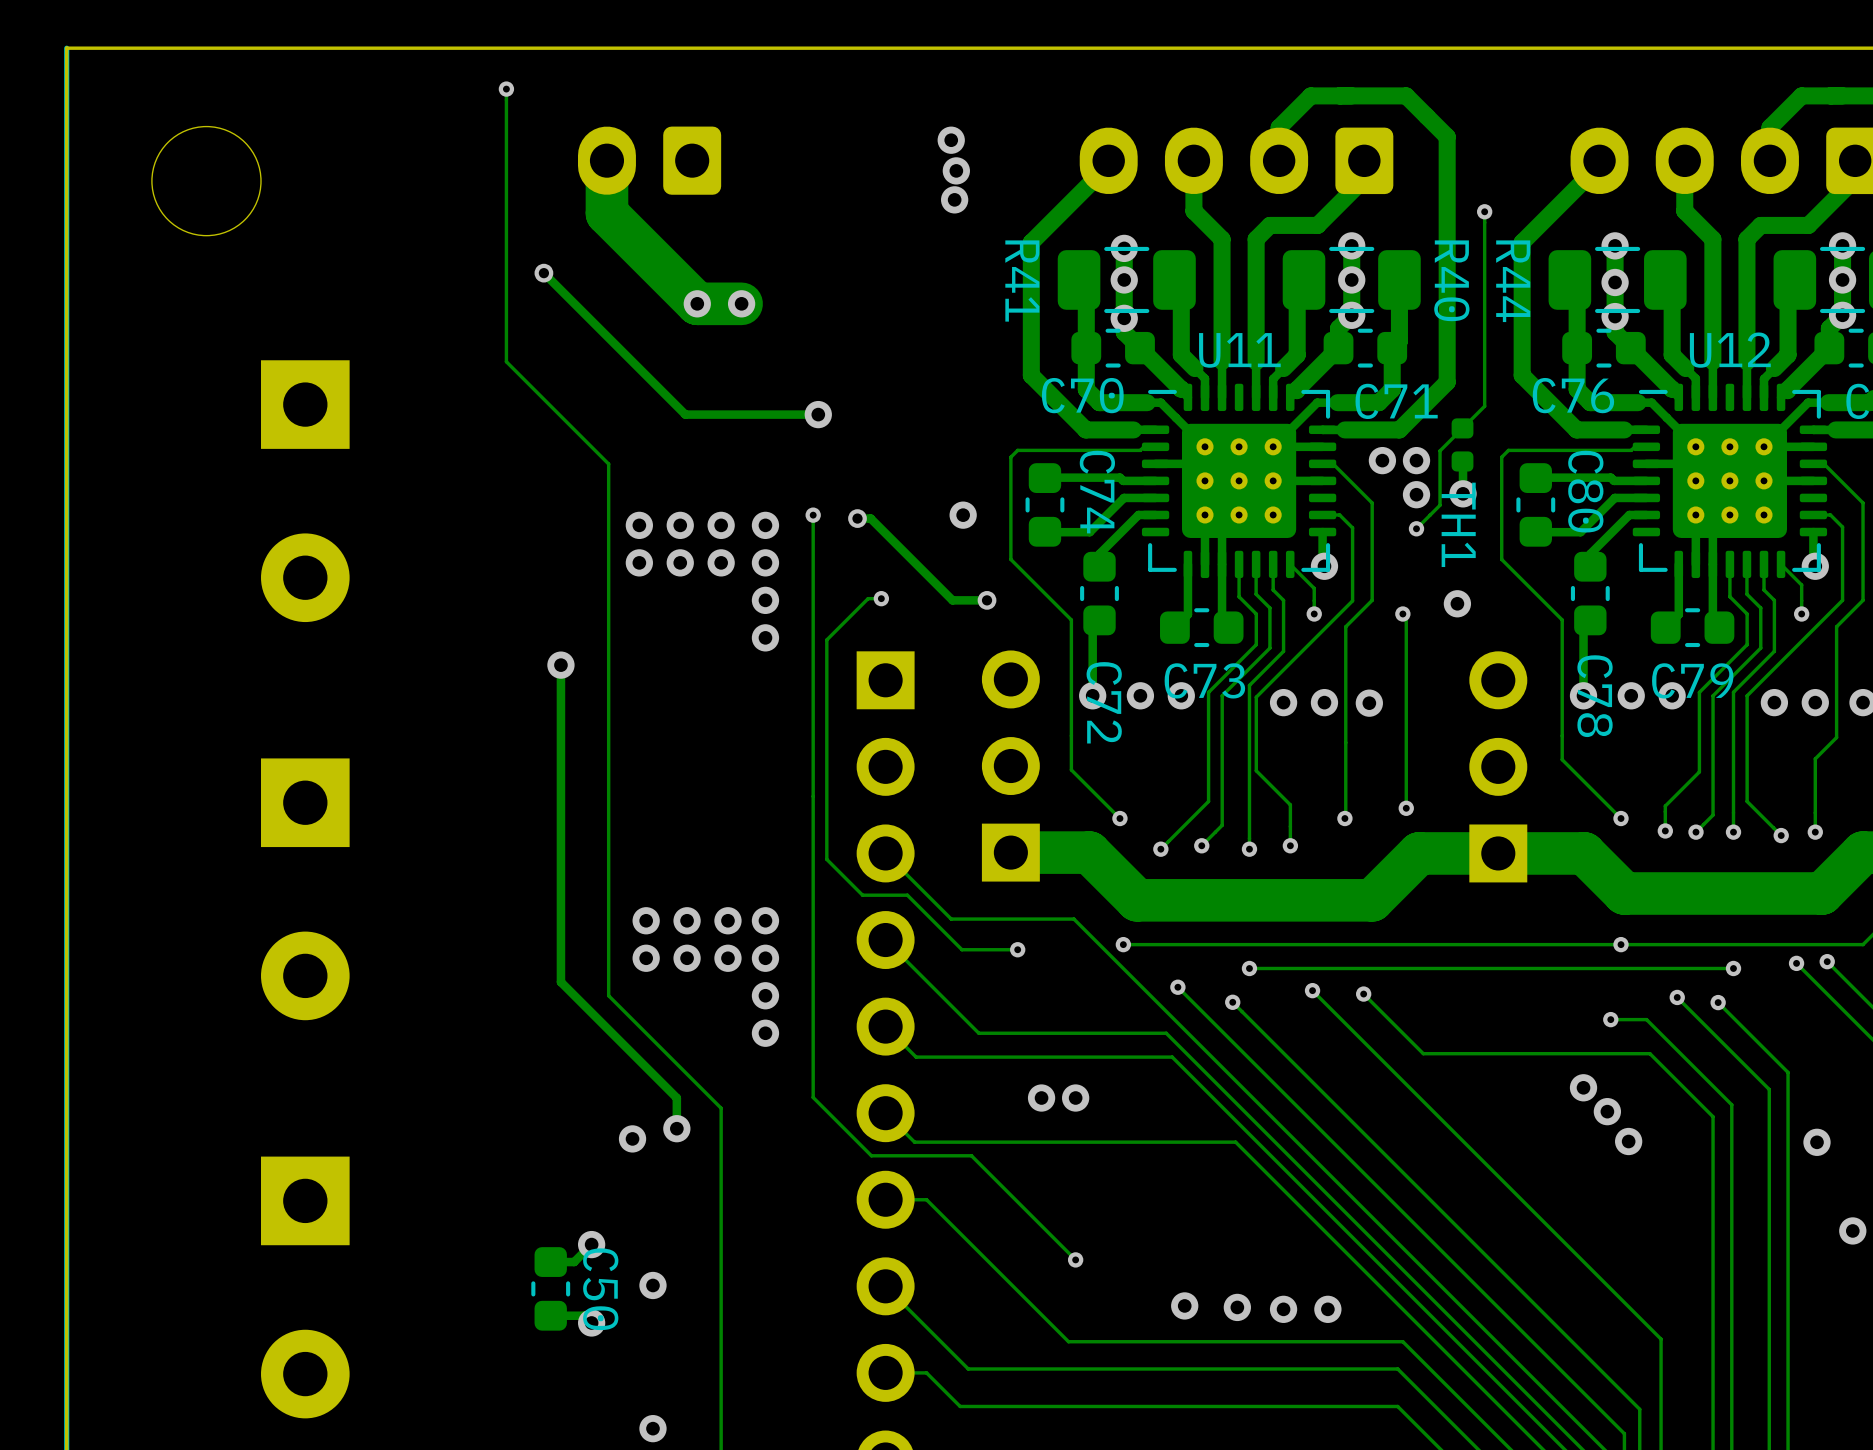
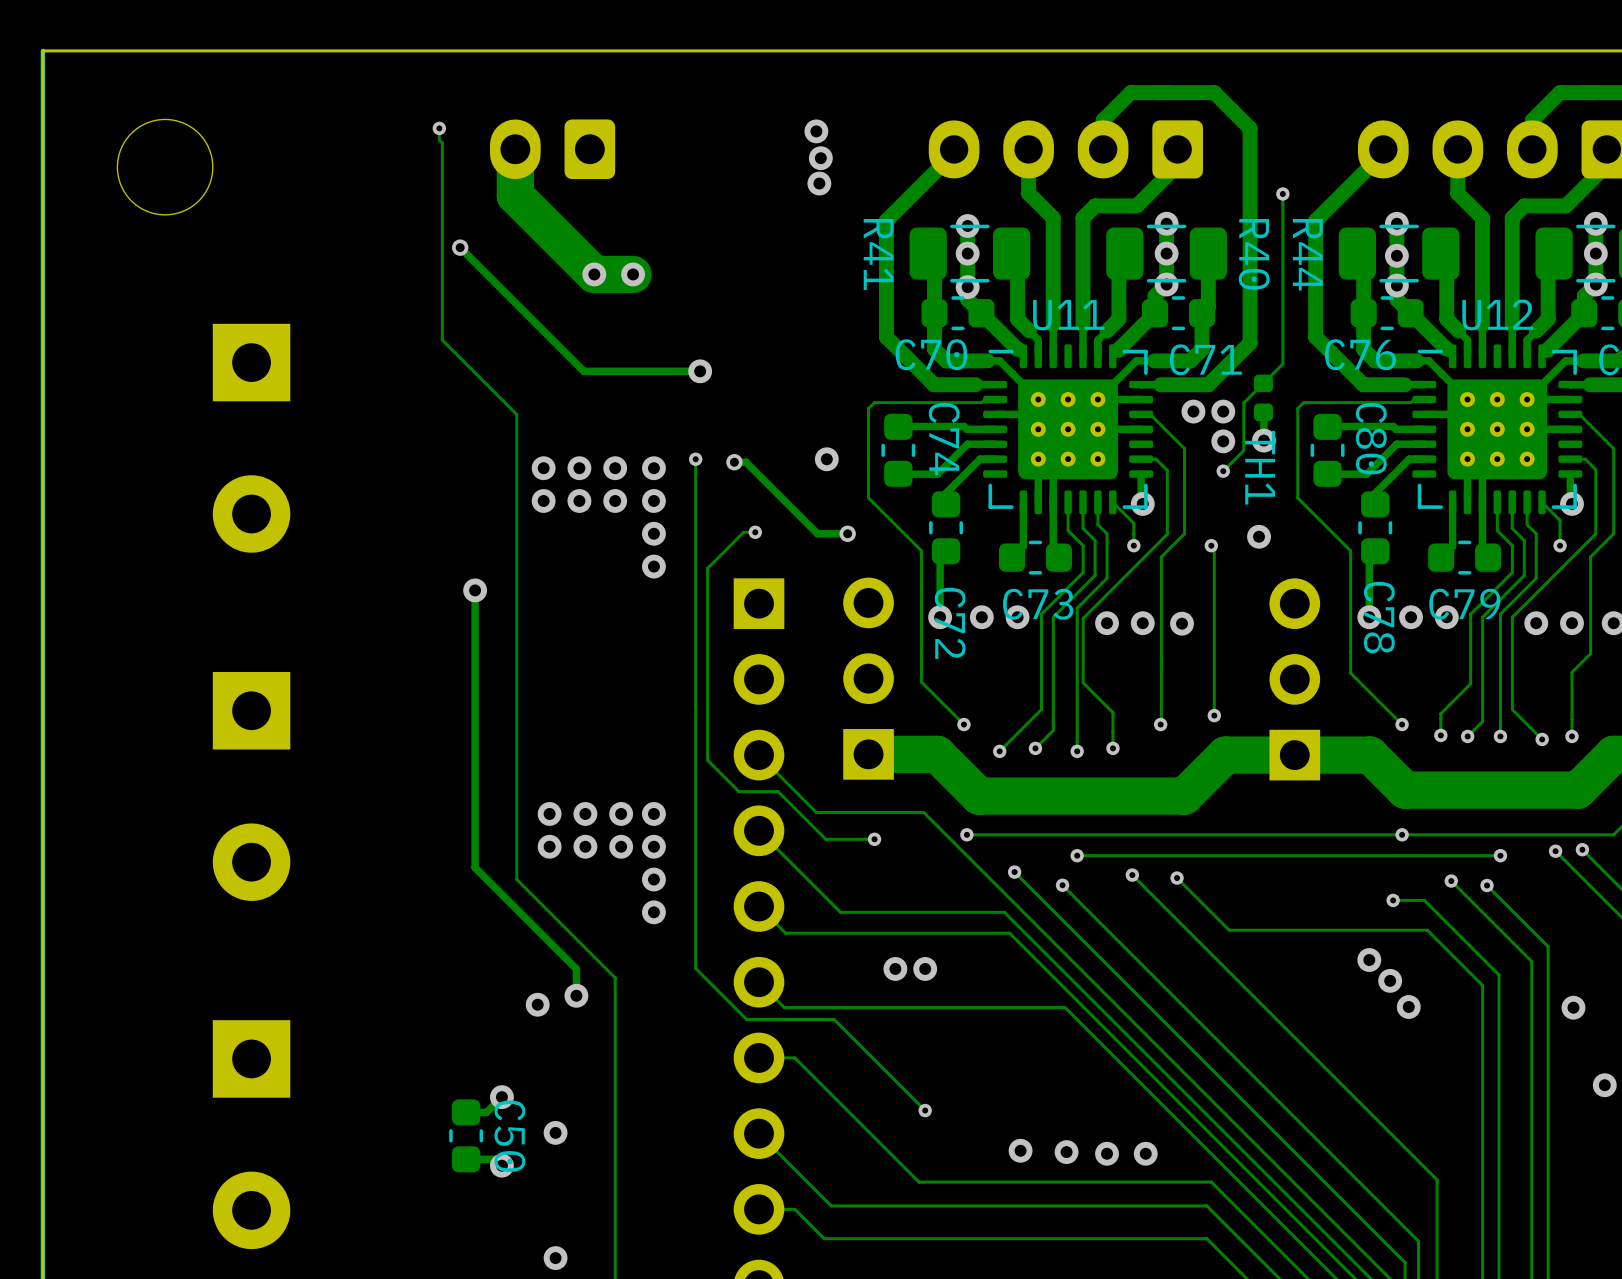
track: (506, 89) (506, 361) (523, 378) -> (439, 128) (439, 139) (442, 142) (442, 340)
via position: (506, 89) -> (439, 128)

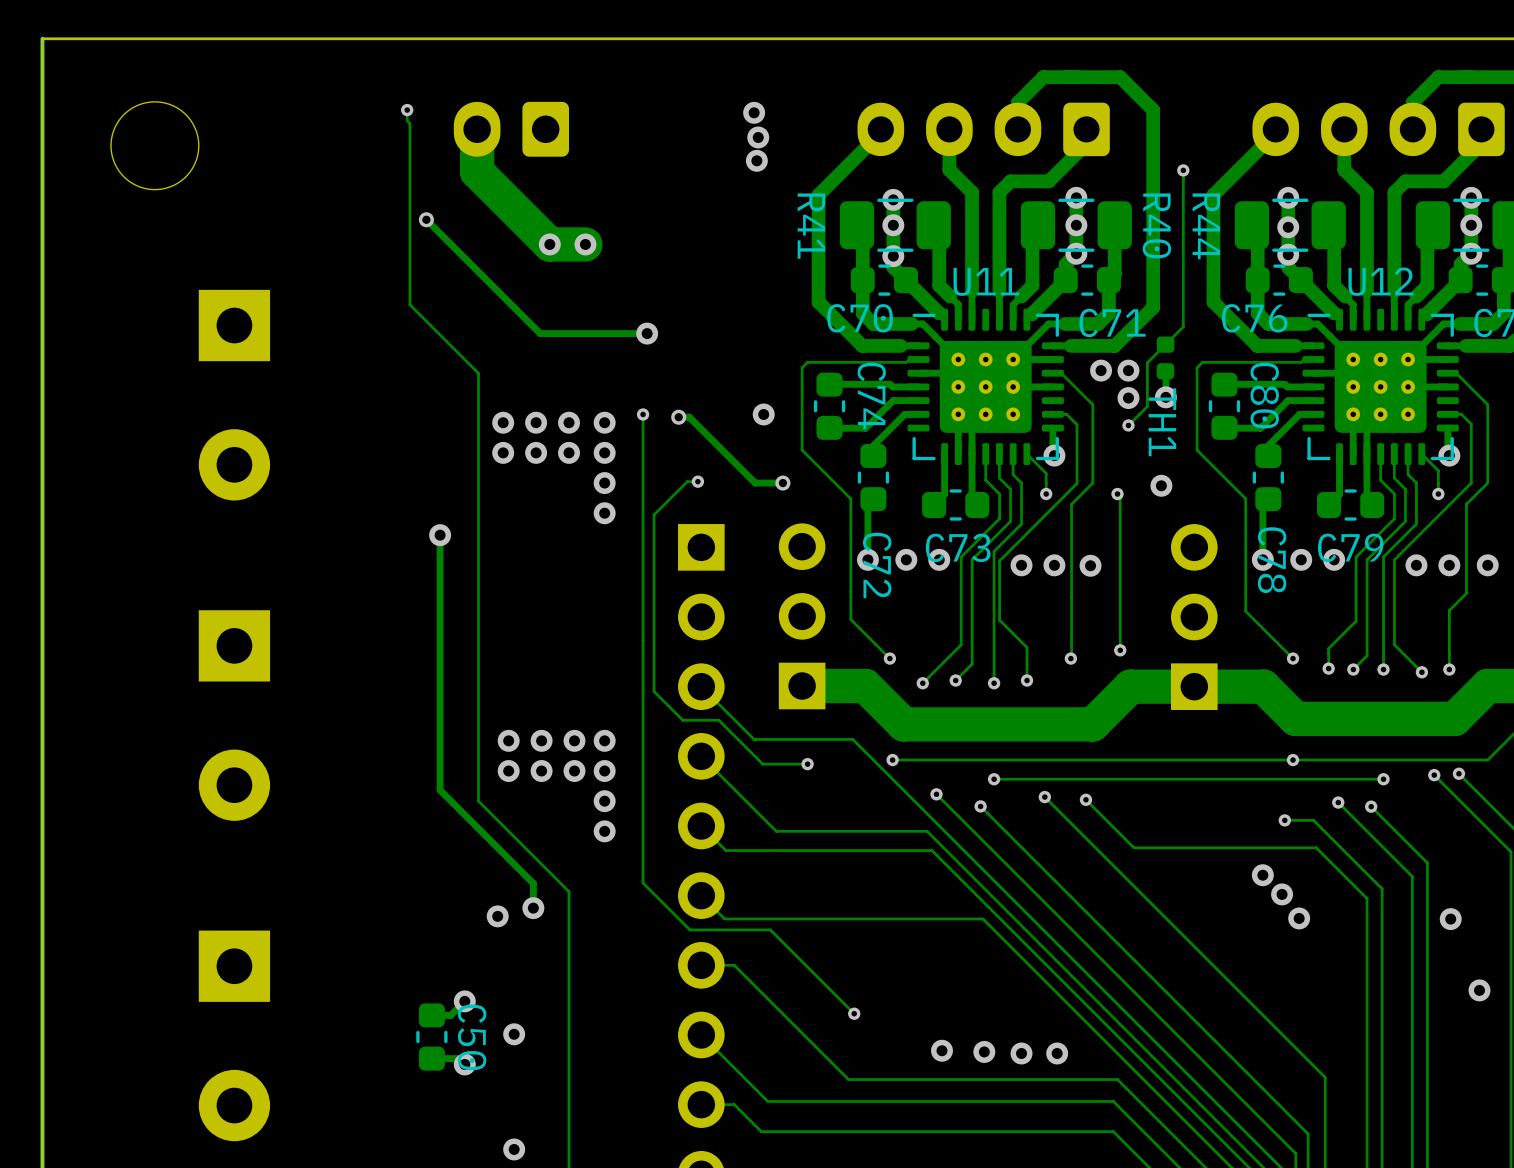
via: (895, 968) -> none
via: (925, 968) -> none

